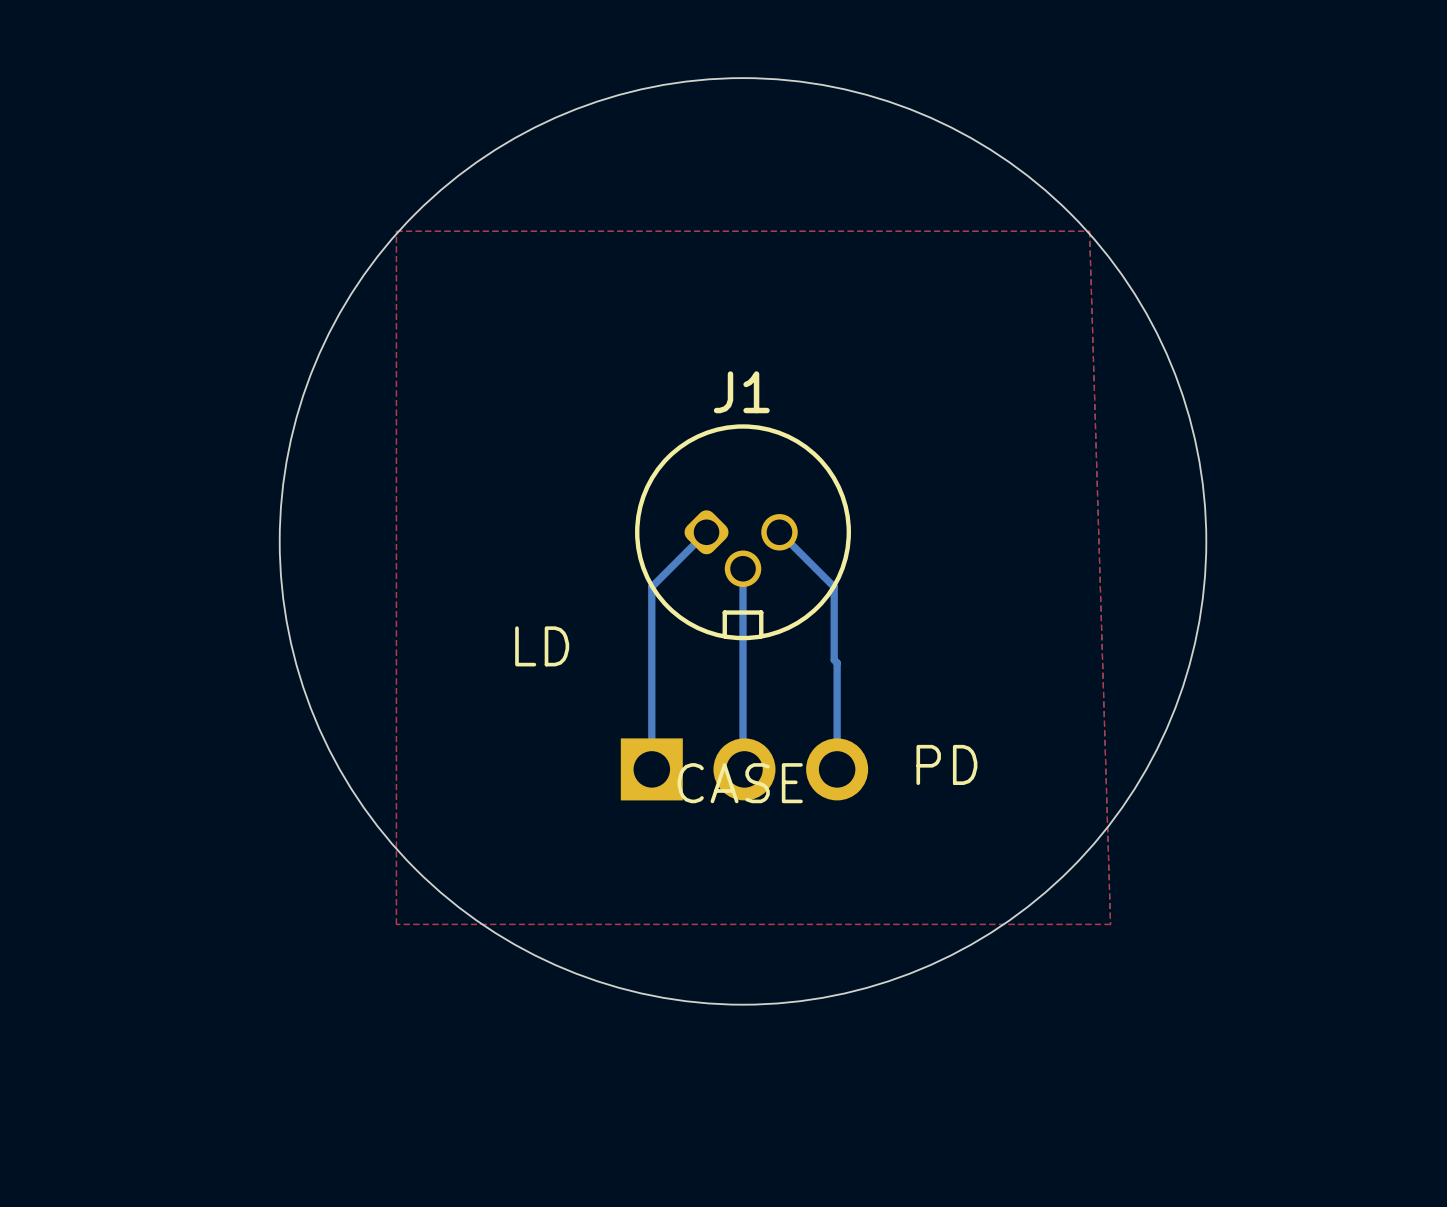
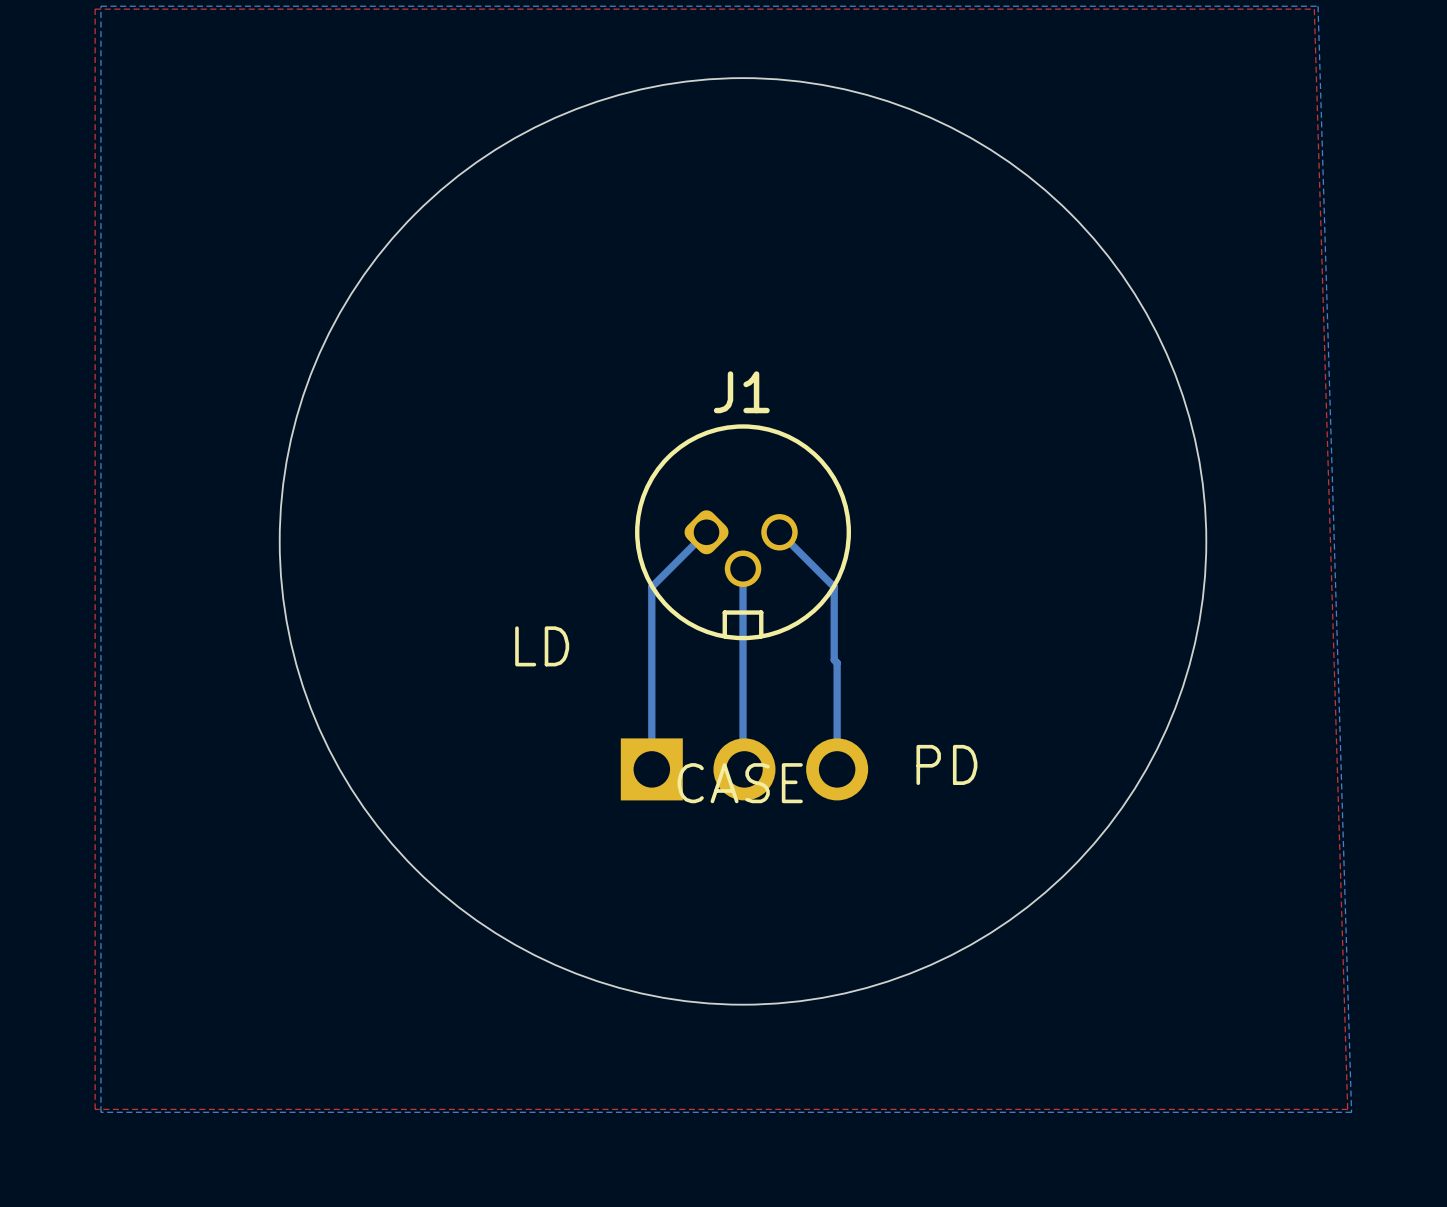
bottom zone outline: none -> (100, 6) (1318, 6) (1351, 1112) (100, 1112) (100, 6)
top zone outline: none -> (95, 9) (1314, 9) (1347, 1109) (95, 1109) (95, 9)
top zone outline: (396, 231) (1089, 231) (1110, 924) (396, 924) (396, 231) -> none

